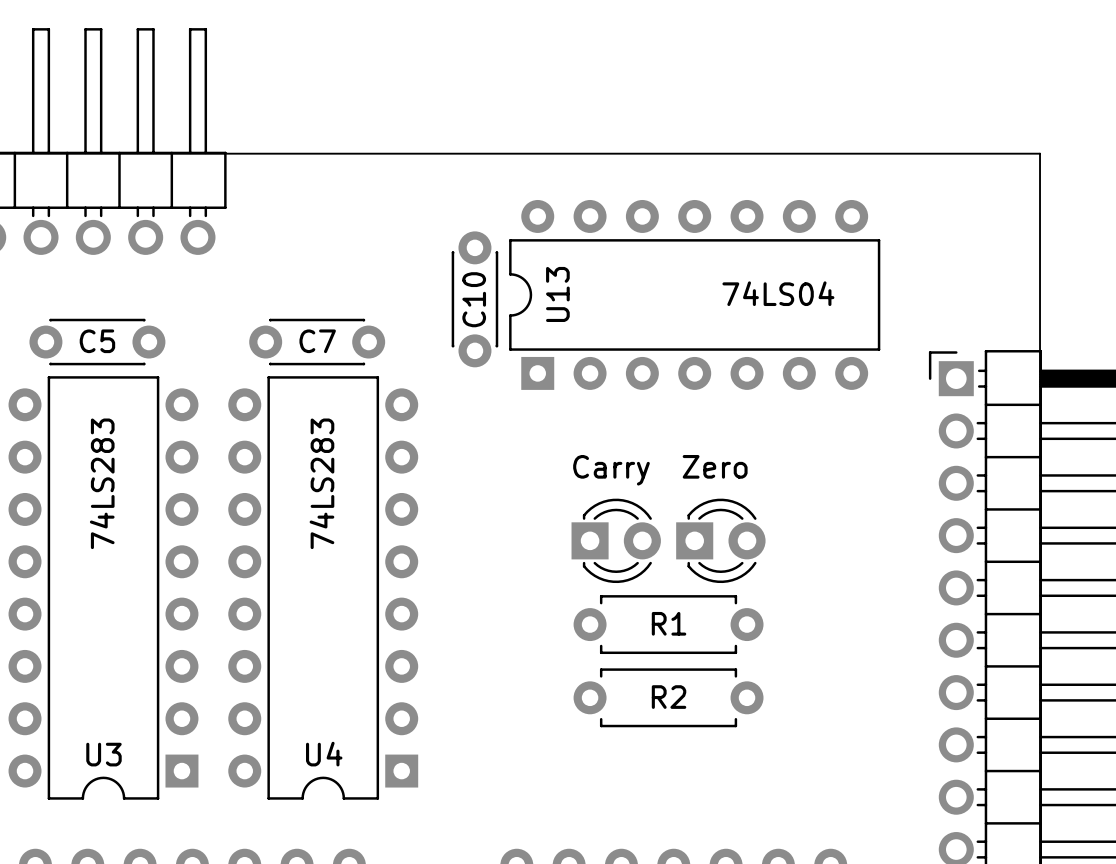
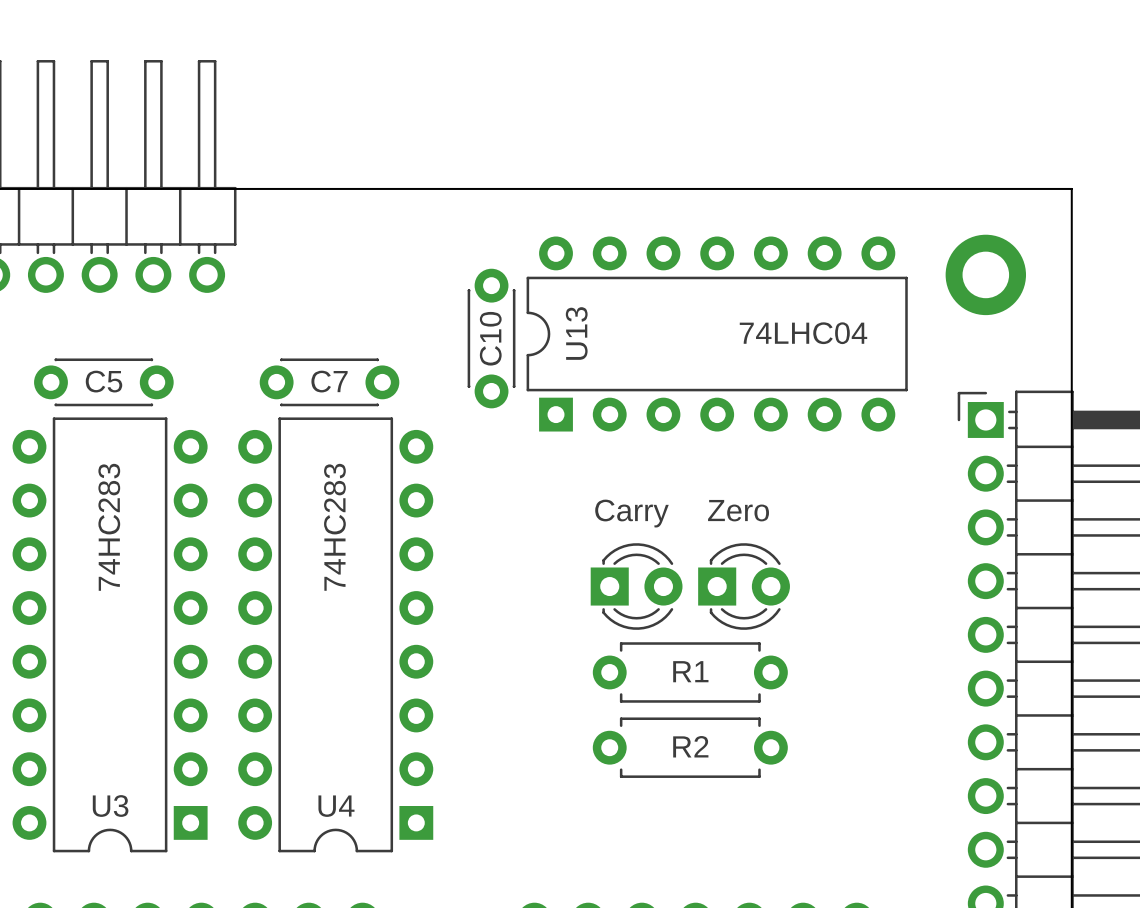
part: none -> (985, 274)
U13 value: 74LS04 (778, 293) -> 74LHC04 (803, 333)
U3 value: 74LS283 (102, 483) -> 74HC283 (109, 527)
U4 value: 74LS283 (321, 483) -> 74HC283 (334, 527)

